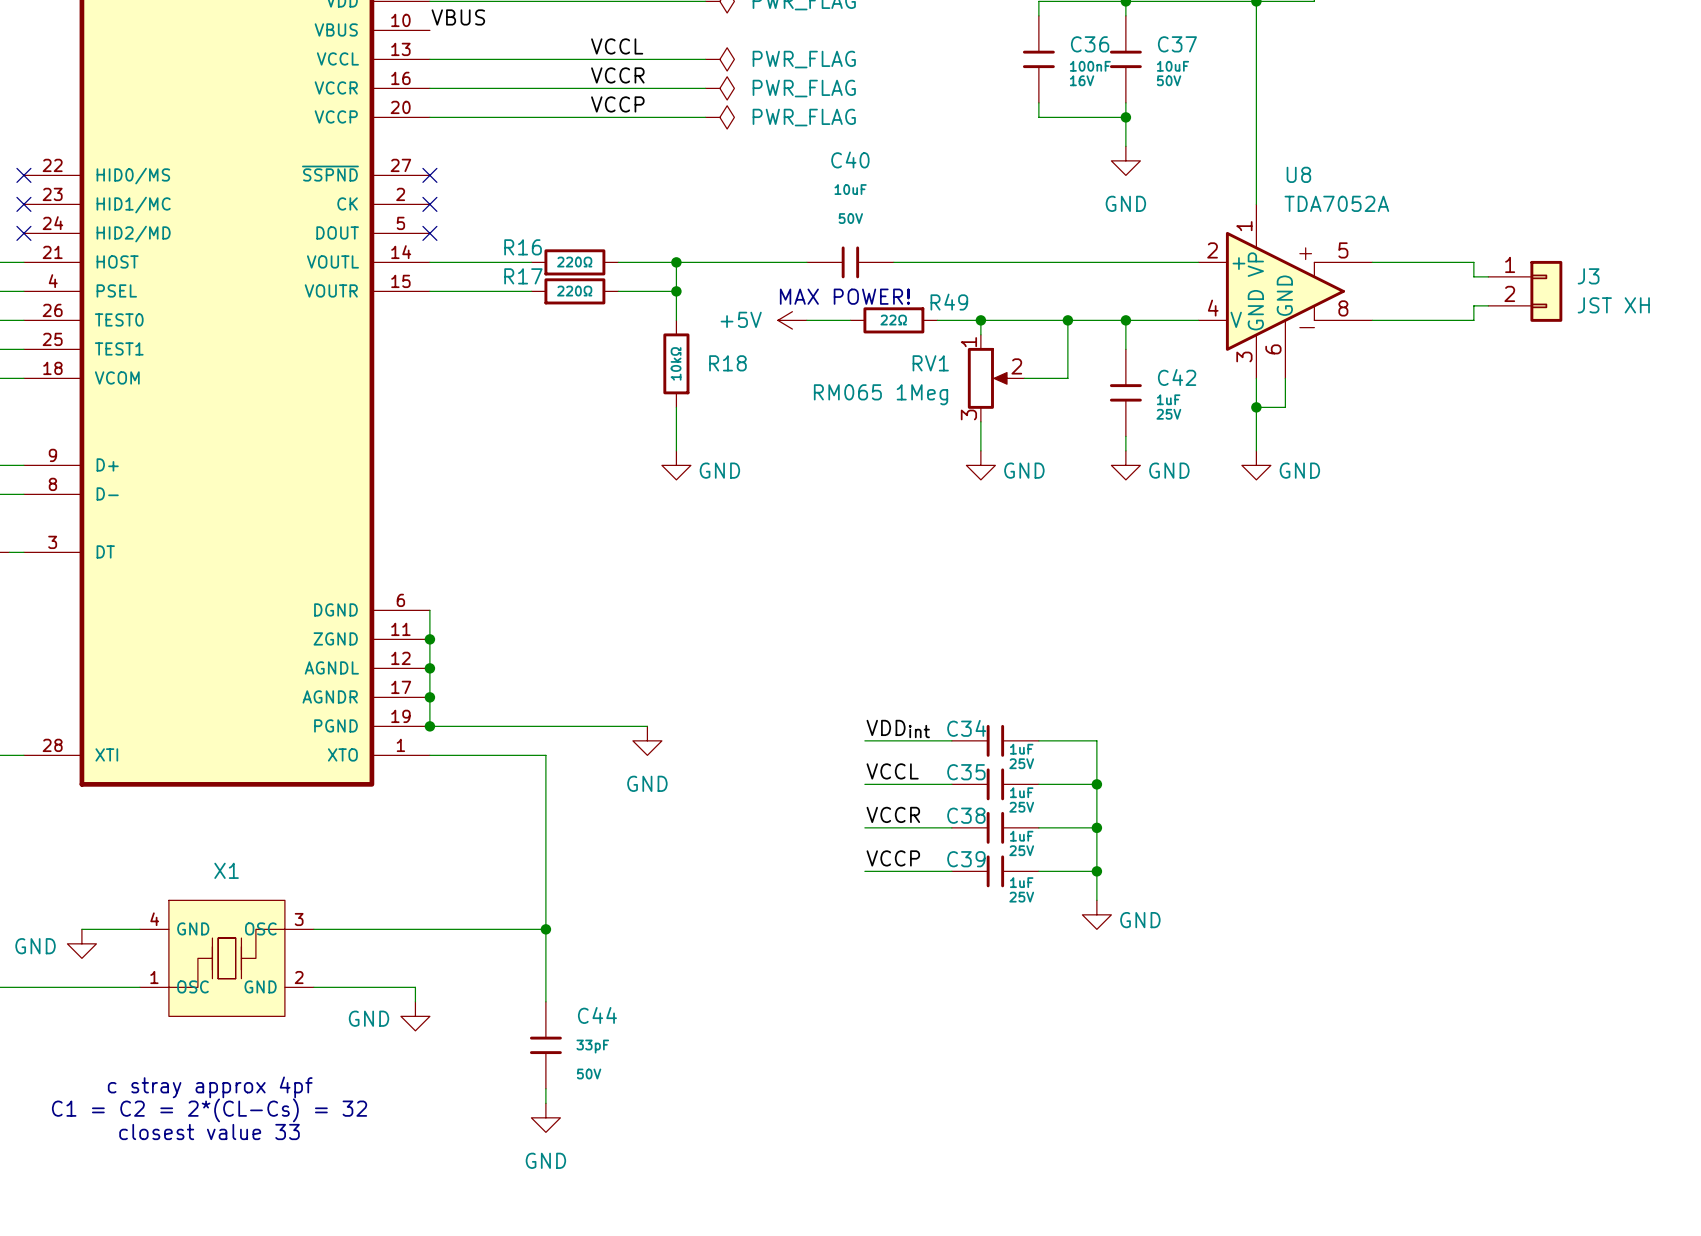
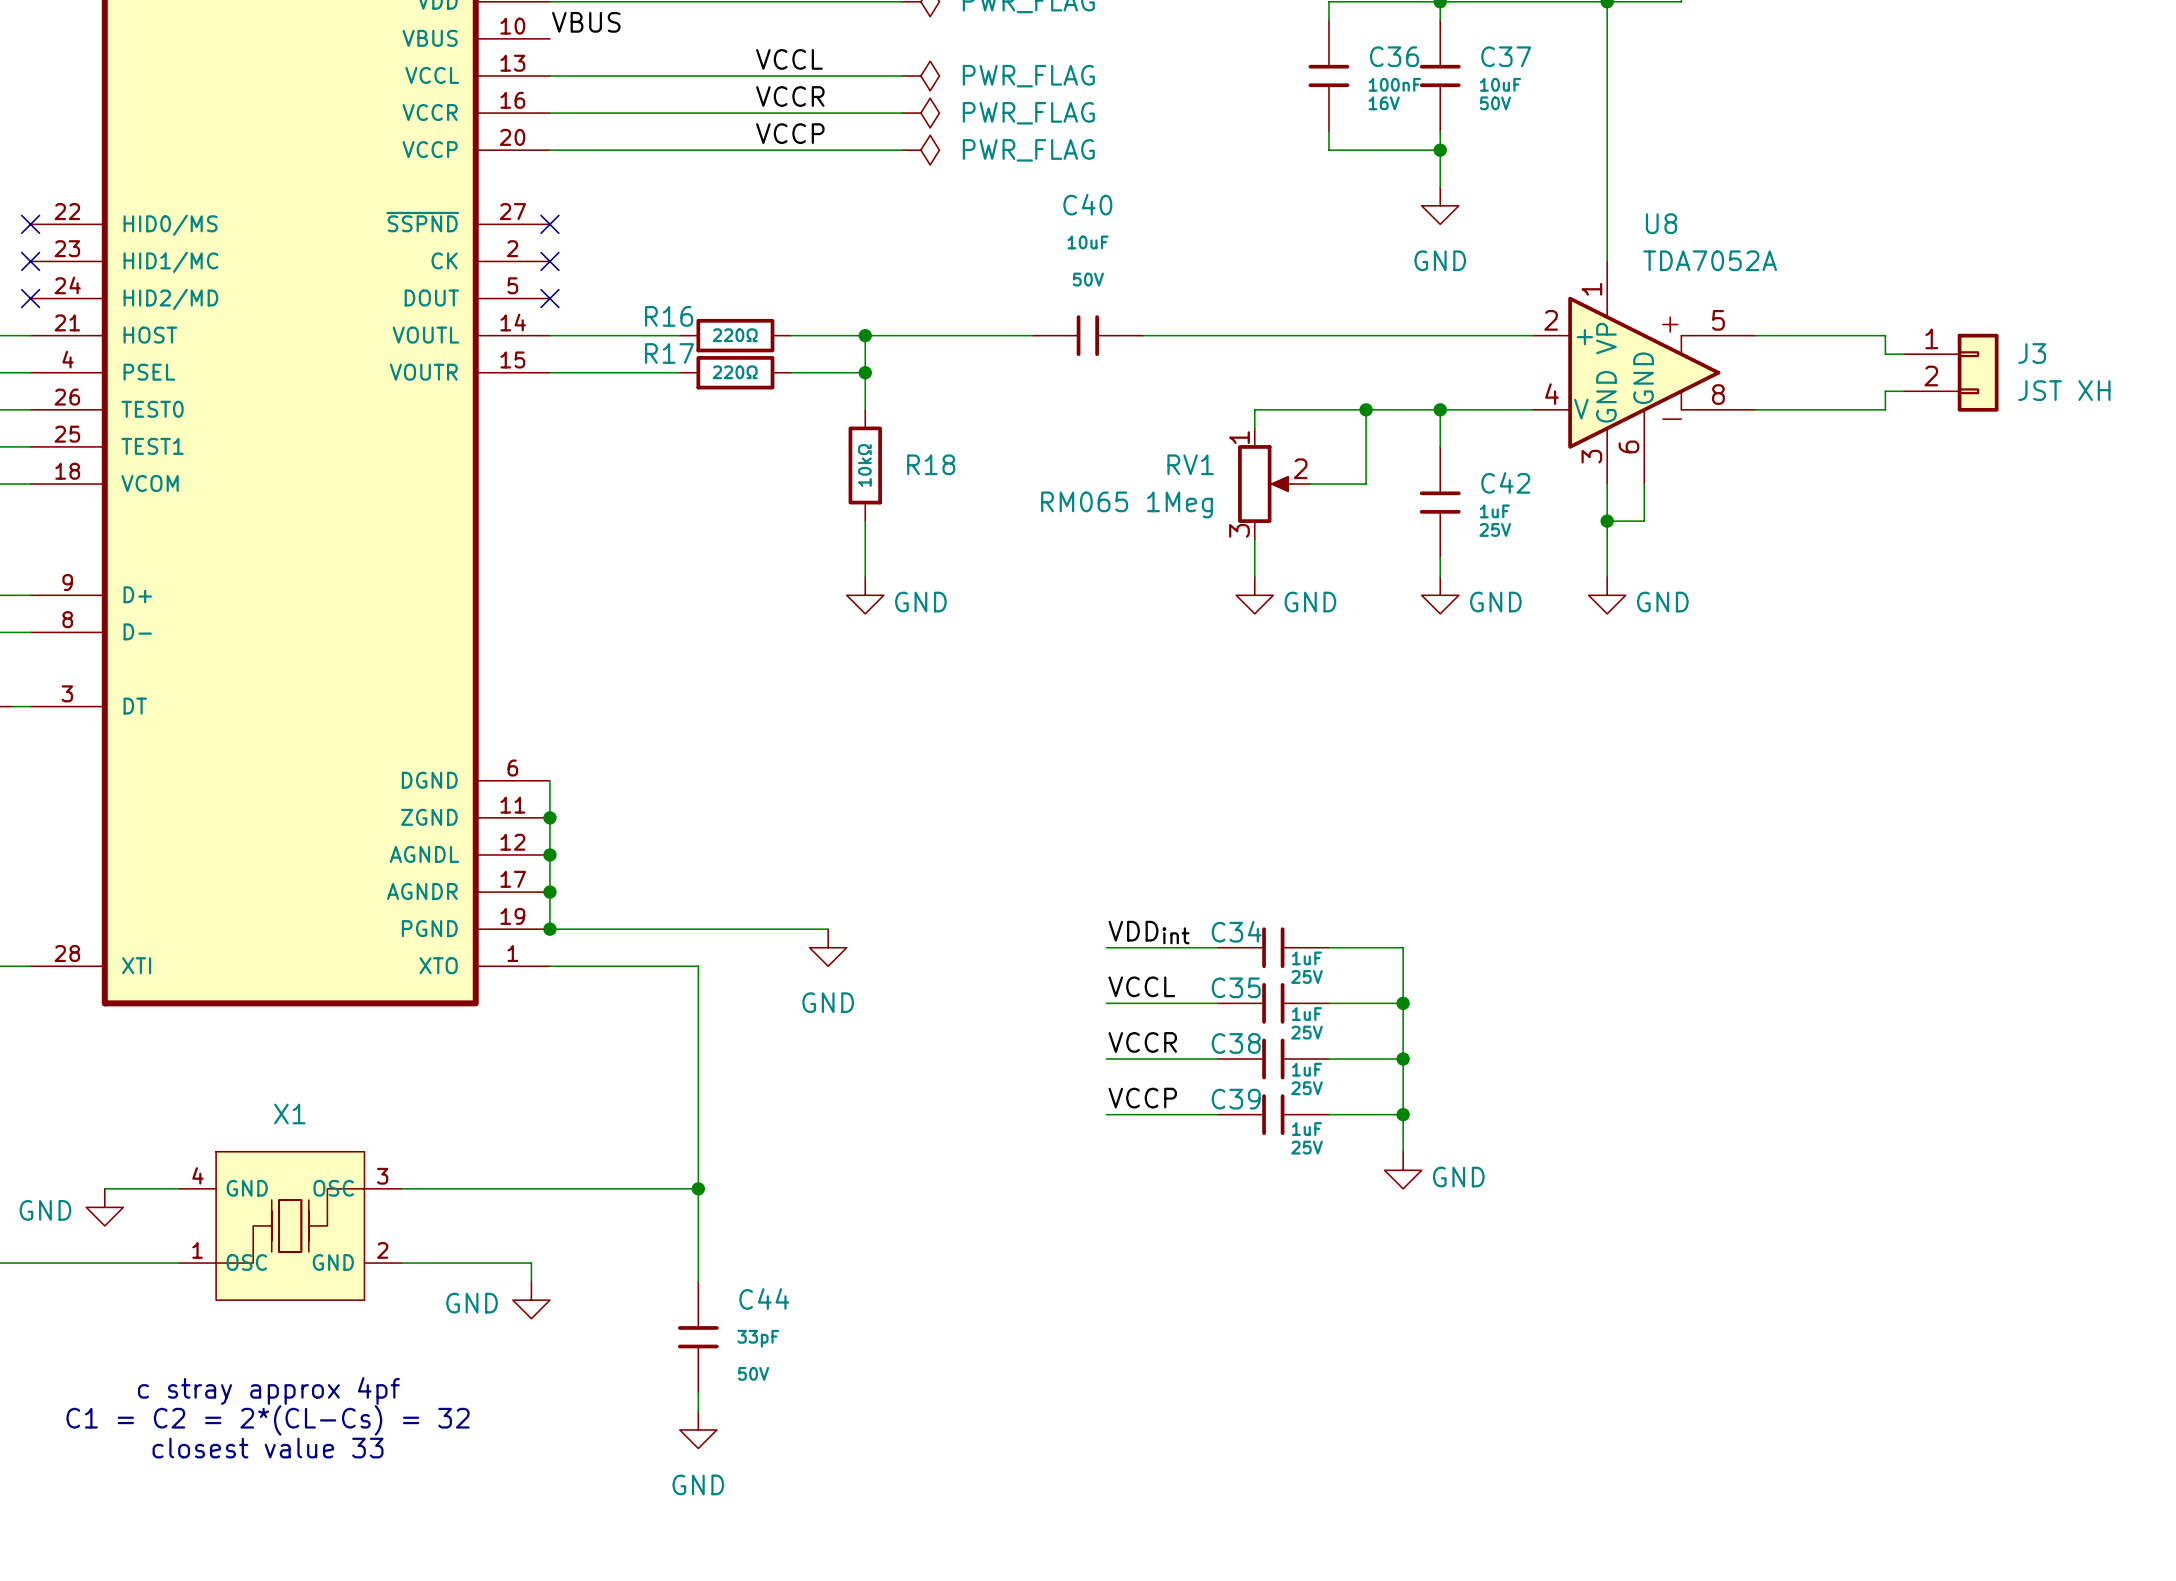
text: MAX POWER! (844, 296) -> none
power symbol: +5V (792, 320) -> none
wire: (806, 320) (850, 320) -> none
R49: 22Ω (893, 320) -> none
wire: (937, 320) (980, 320) -> none
junction: (980, 320) -> none

